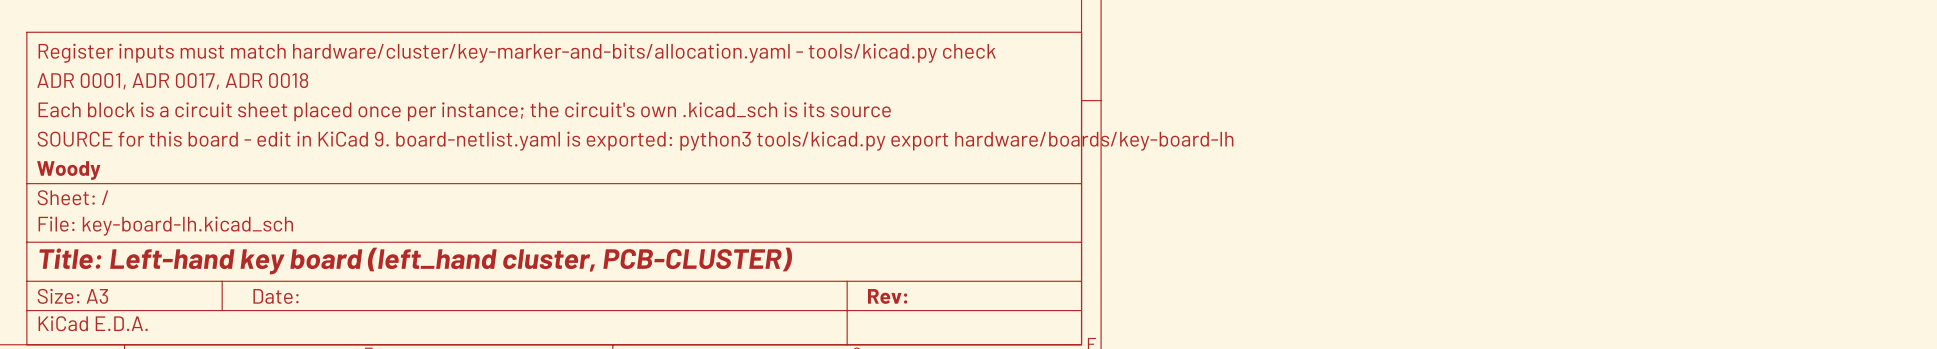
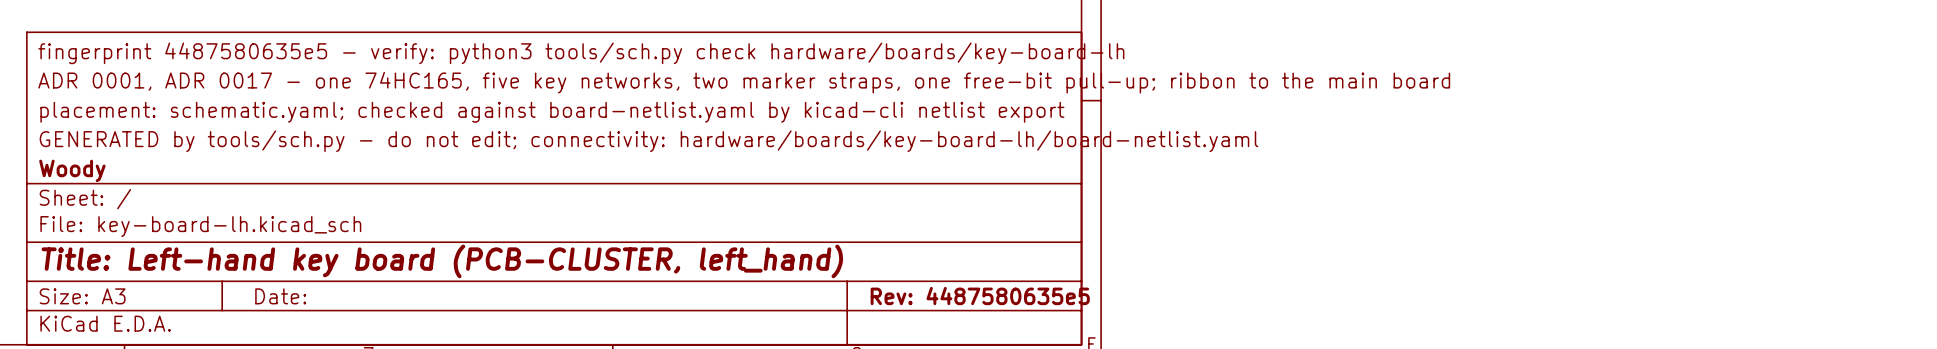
title block: Register inputs must match hardware/cluster/key-marker-and-bits/allocation.yaml - tools/kicad.py check (517, 53) -> fingerprint 4487580635e5 - verify: python3 tools/sch.py check hardware/boards/key-board-lh (581, 53)
title block: ADR 0001, ADR 0017, ADR 0018 (172, 81) -> ADR 0001, ADR 0017 - one 74HC165, five key networks, two marker straps, one free-bit pull-up; ribbon to the main board (744, 82)
title block: Each block is a circuit sheet placed once per instance; the circuit's own .kicad_sch is its source (464, 111) -> placement: schematic.yaml; checked against board-netlist.yaml by kicad-cli netlist export (552, 112)
title block: SOURCE for this board - edit in KiCad 9. board-netlist.yaml is exported: python3 tools/kicad.py export hardware/boards/key-board-lh (635, 141) -> GENERATED by tools/sch.py - do not edit; connectivity: hardware/boards/key-board-lh/board-netlist.yaml (649, 141)
title block: Title: Left-hand key board (left_hand cluster, PCB-CLUSTER) (415, 261) -> Title: Left-hand key board (PCB-CLUSTER, left_hand) (442, 261)
title block: Rev: (887, 296) -> Rev: 4487580635e5 (980, 296)

